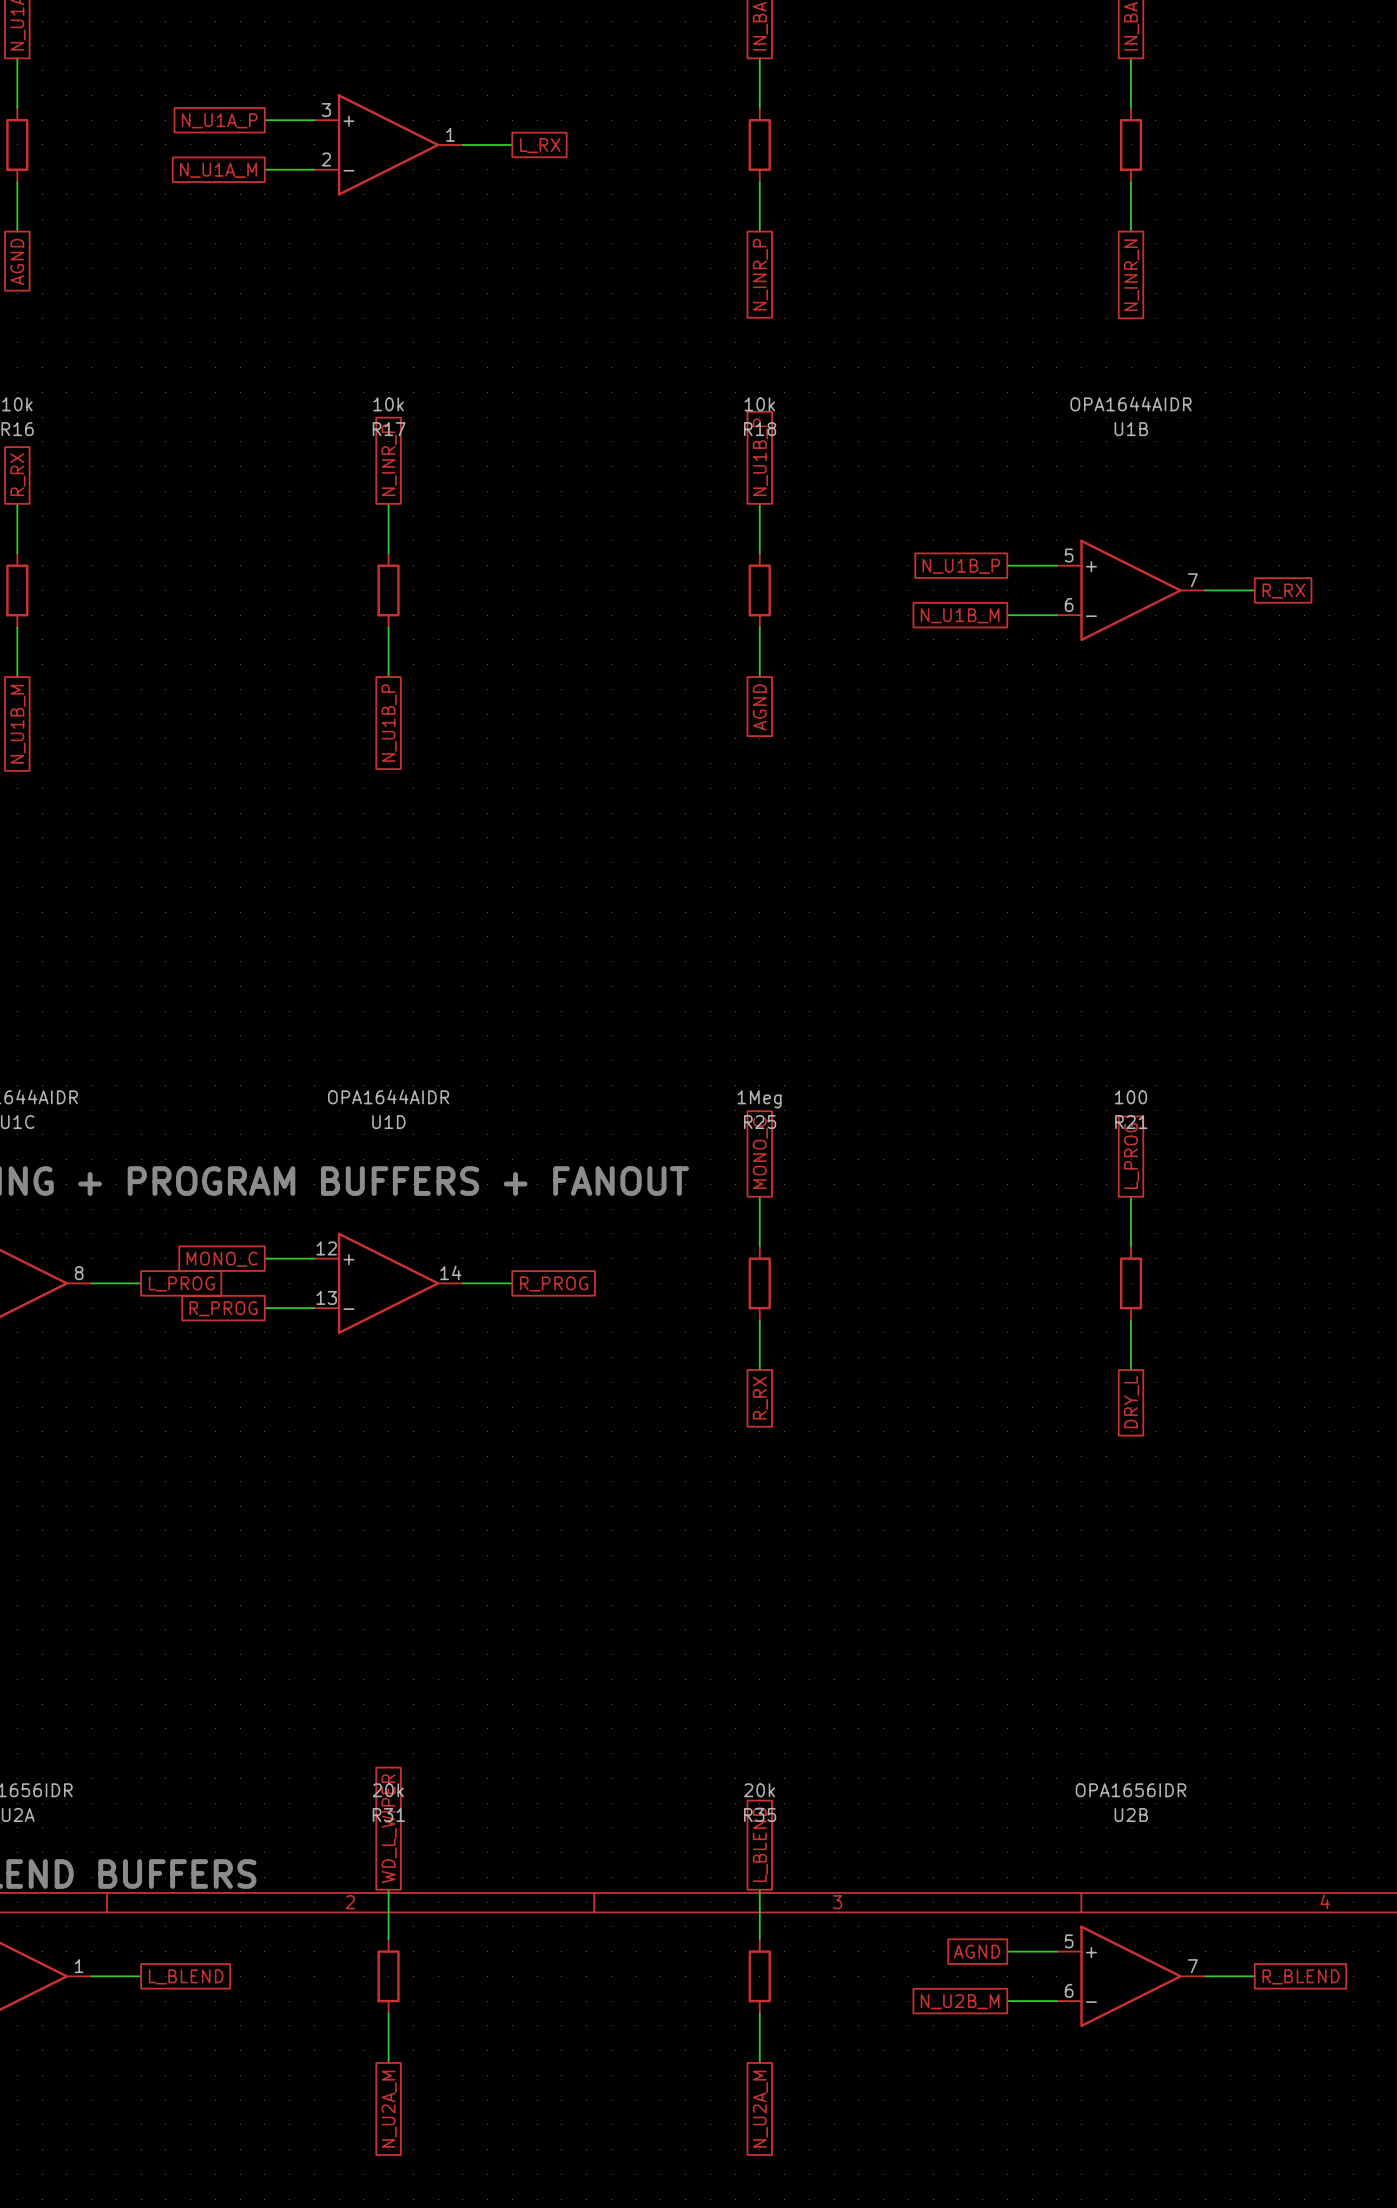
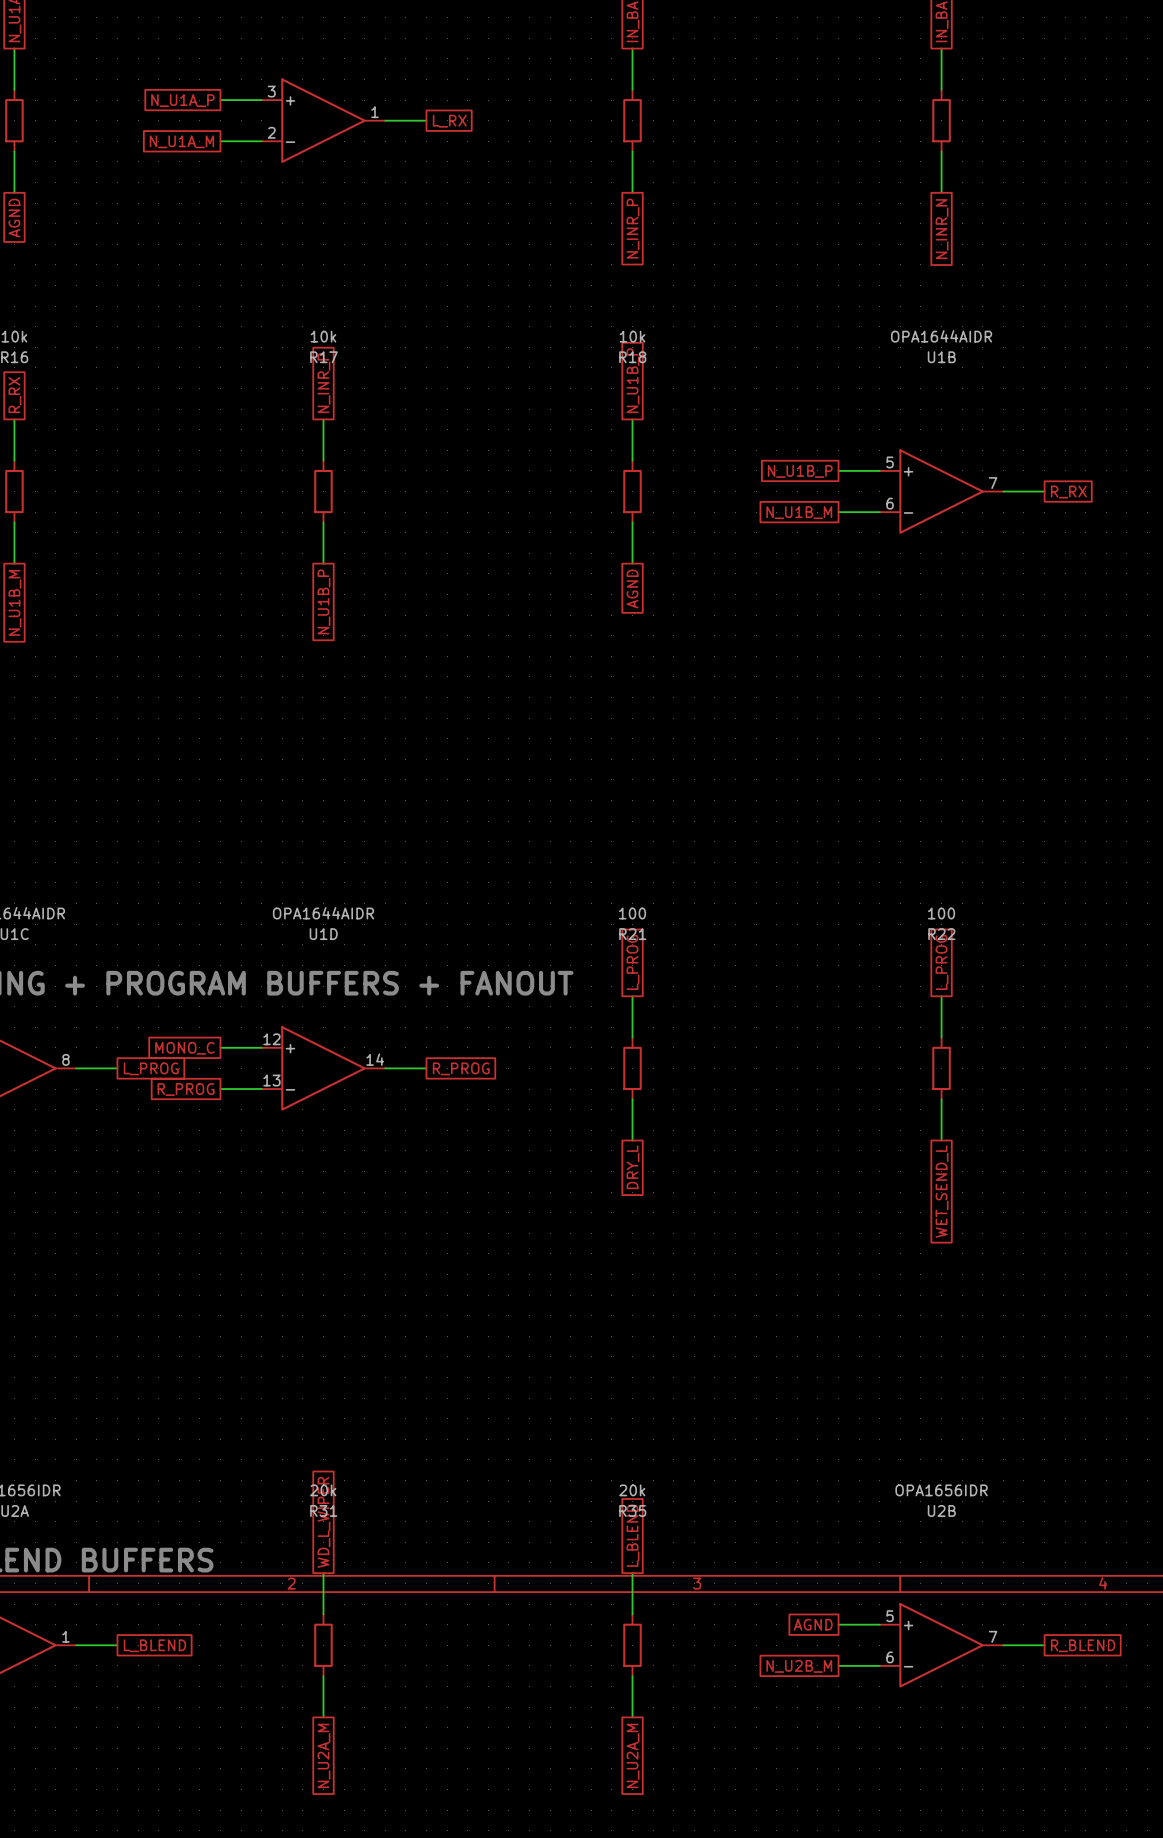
R25 value: 1Meg (759, 1099) -> 100 (632, 913)
R25 name: R25 (760, 1122) -> R21 (632, 934)
R21 name: R21 (1131, 1122) -> R22 (941, 934)
global label: MONO_C (760, 1153) -> L_PROG (633, 962)
global label: R_RX (760, 1398) -> DRY_L (633, 1167)
global label: DRY_L (1131, 1402) -> WET_SEND_L (942, 1191)

